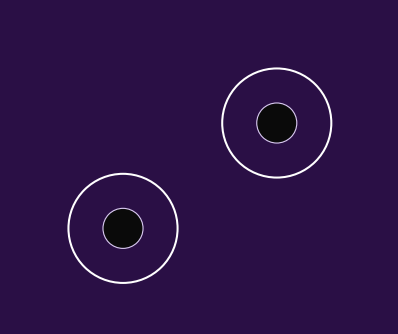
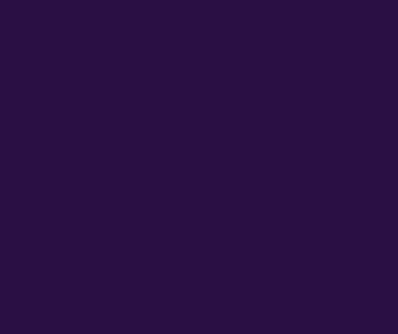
part: (276, 123) -> none
part: (123, 228) -> none

